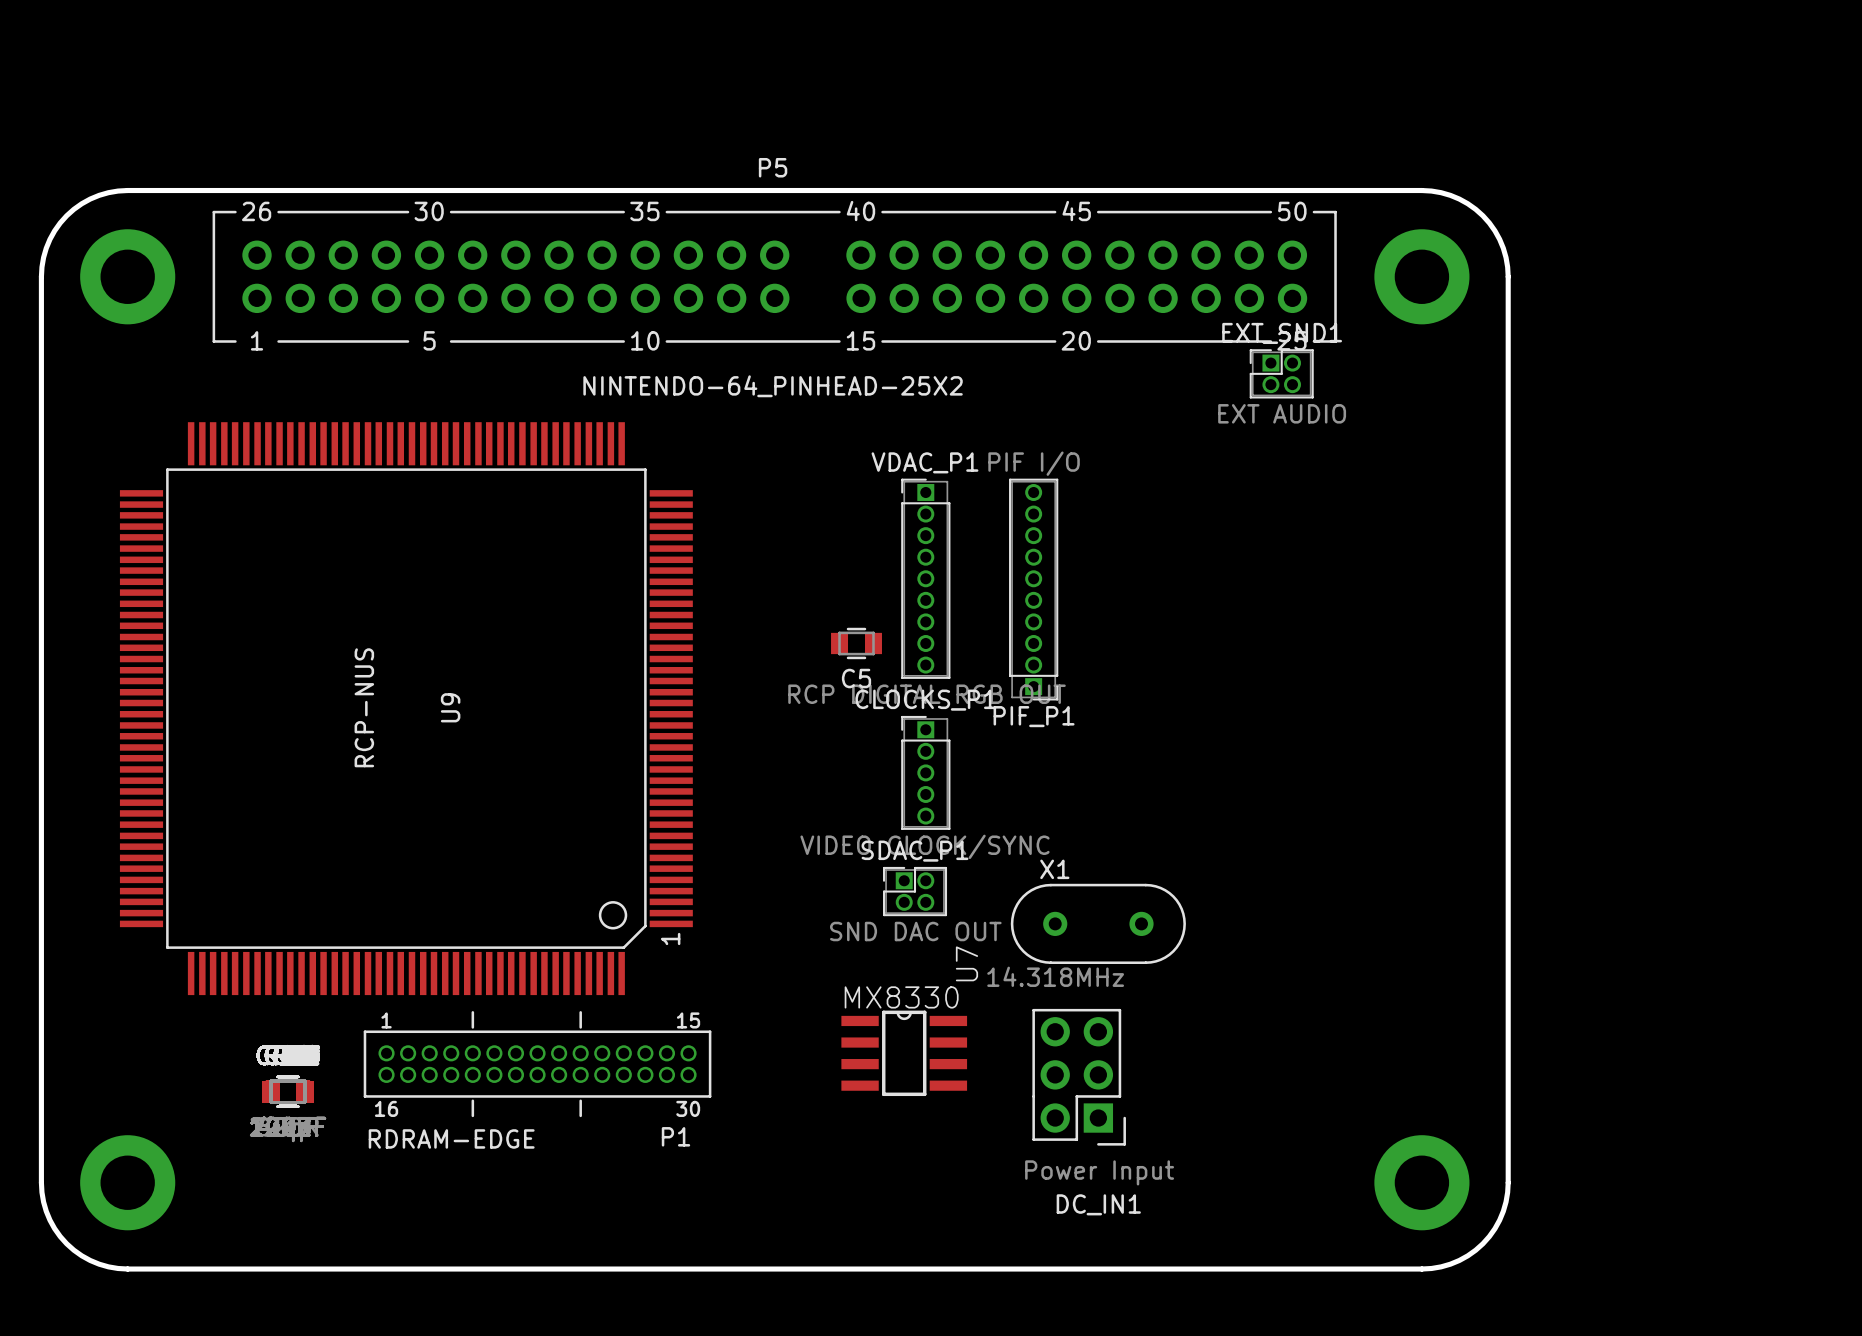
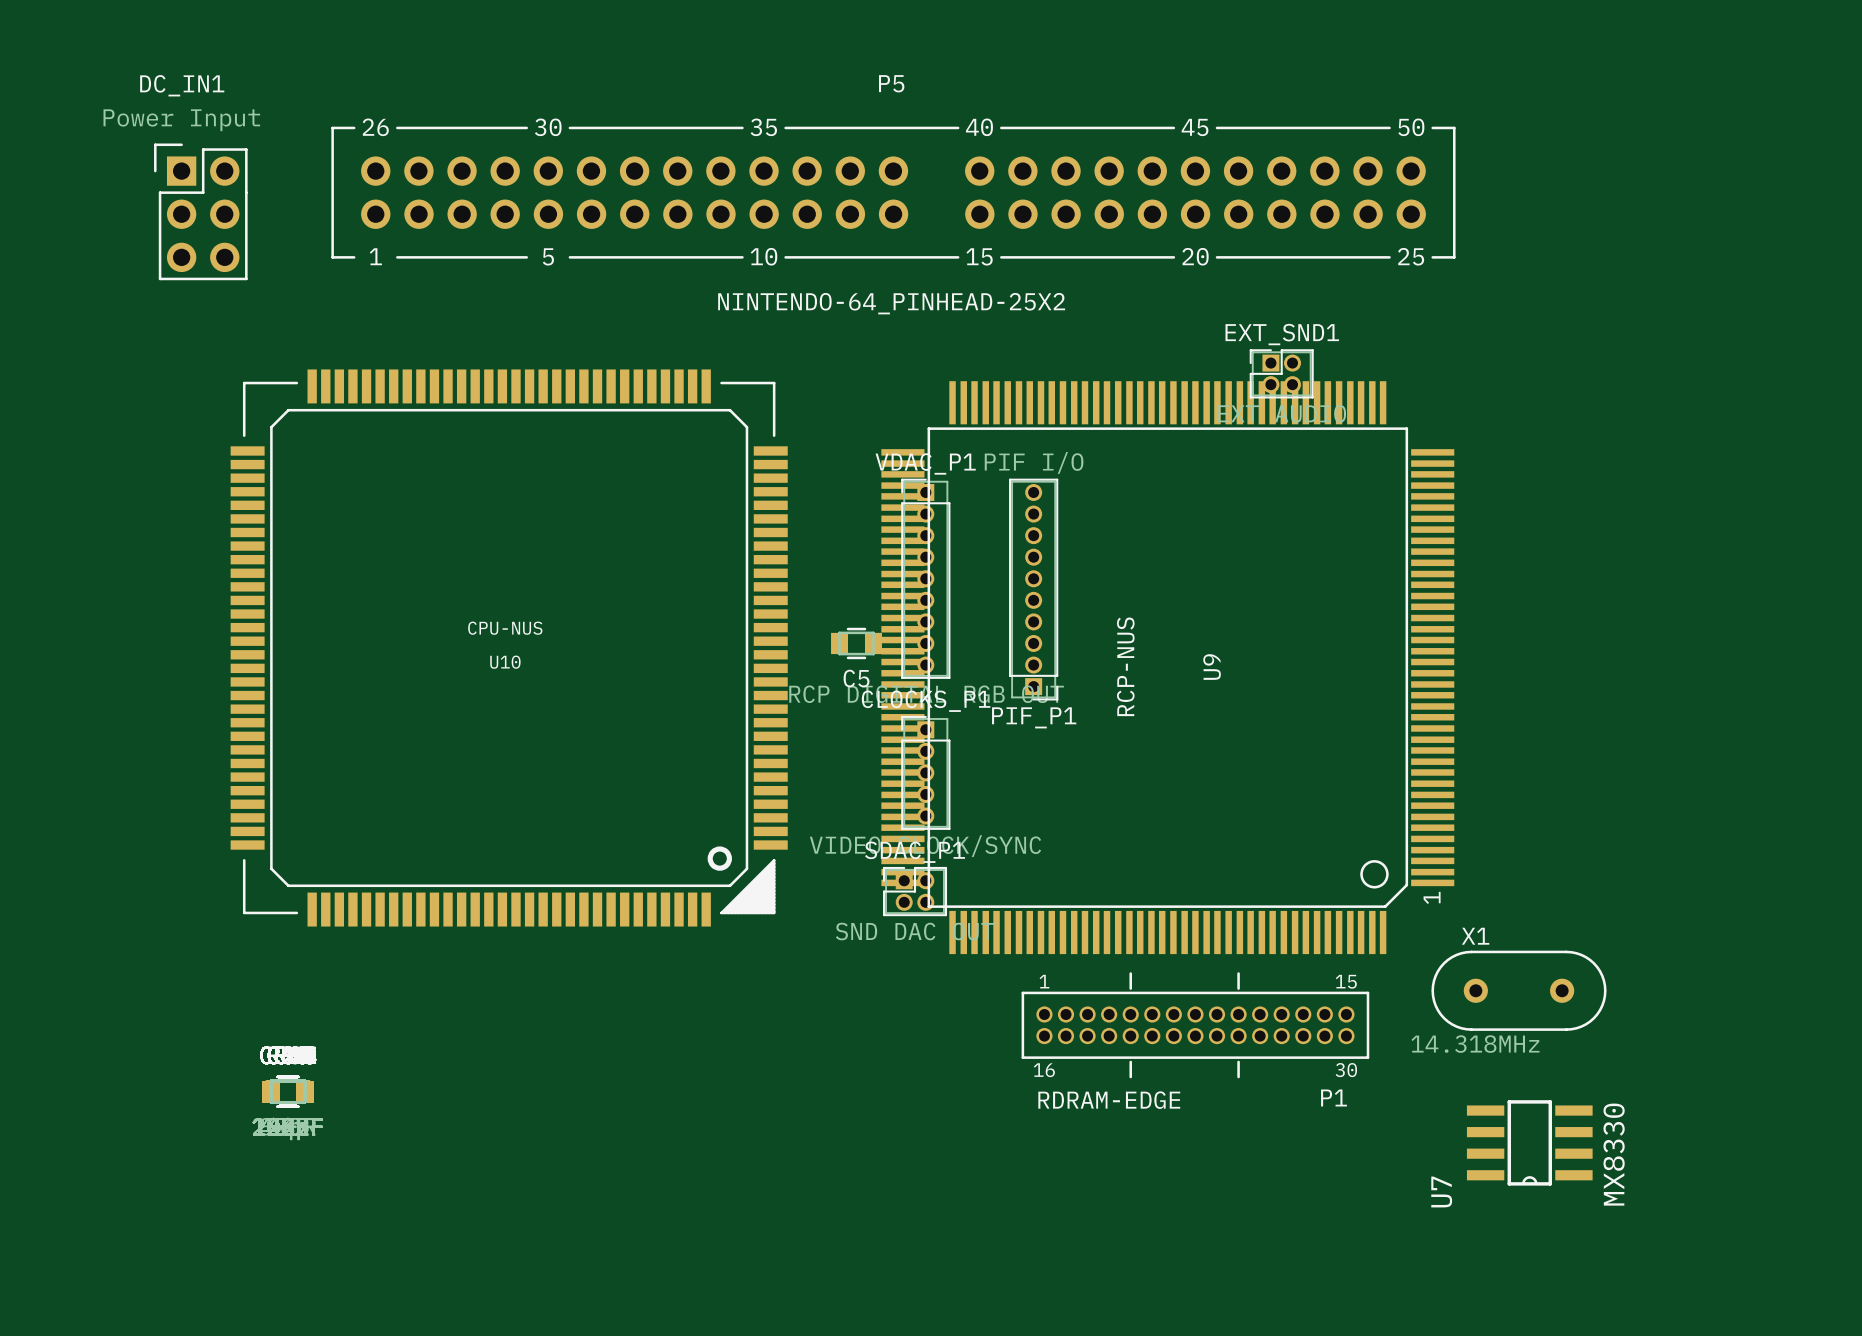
board edge: (127, 190) (1421, 190) (1450, 195) (1475, 209) (1489, 222) (1499, 239) (1506, 257) (1508, 276) (1508, 1182) (1503, 1211) (1489, 1236) (1475, 1250) (1459, 1260) (1441, 1266) (1421, 1269) (127, 1269) (99, 1264) (73, 1250) (60, 1236) (49, 1220) (43, 1201) (41, 1182) (41, 276) (43, 257) (49, 239) (66, 215) (90, 199) (108, 192) (127, 190) -> none
part: (127, 276) -> none
P5 position: (774, 276) -> (893, 192)
part: (1421, 276) -> none
U10: none -> CPU-NUS (509, 647)
U9 position: (406, 708) -> (1167, 667)
X1 position: (1098, 923) -> (1518, 990)
U7 name position: U7 (966, 963) -> U7 (1441, 1191)
U7 value position: MX8330 (901, 997) -> MX8330 (1614, 1154)
U7 rotation: 0° (904, 1053) -> 180° (1529, 1142)
U7 position: (904, 1053) -> (1529, 1142)
P1 position: (537, 1064) -> (1195, 1025)
DC_IN1 rotation: 0° (1079, 1077) -> 180° (200, 211)
DC_IN1 position: (1079, 1077) -> (200, 211)
part: (127, 1182) -> none
part: (1421, 1182) -> none

